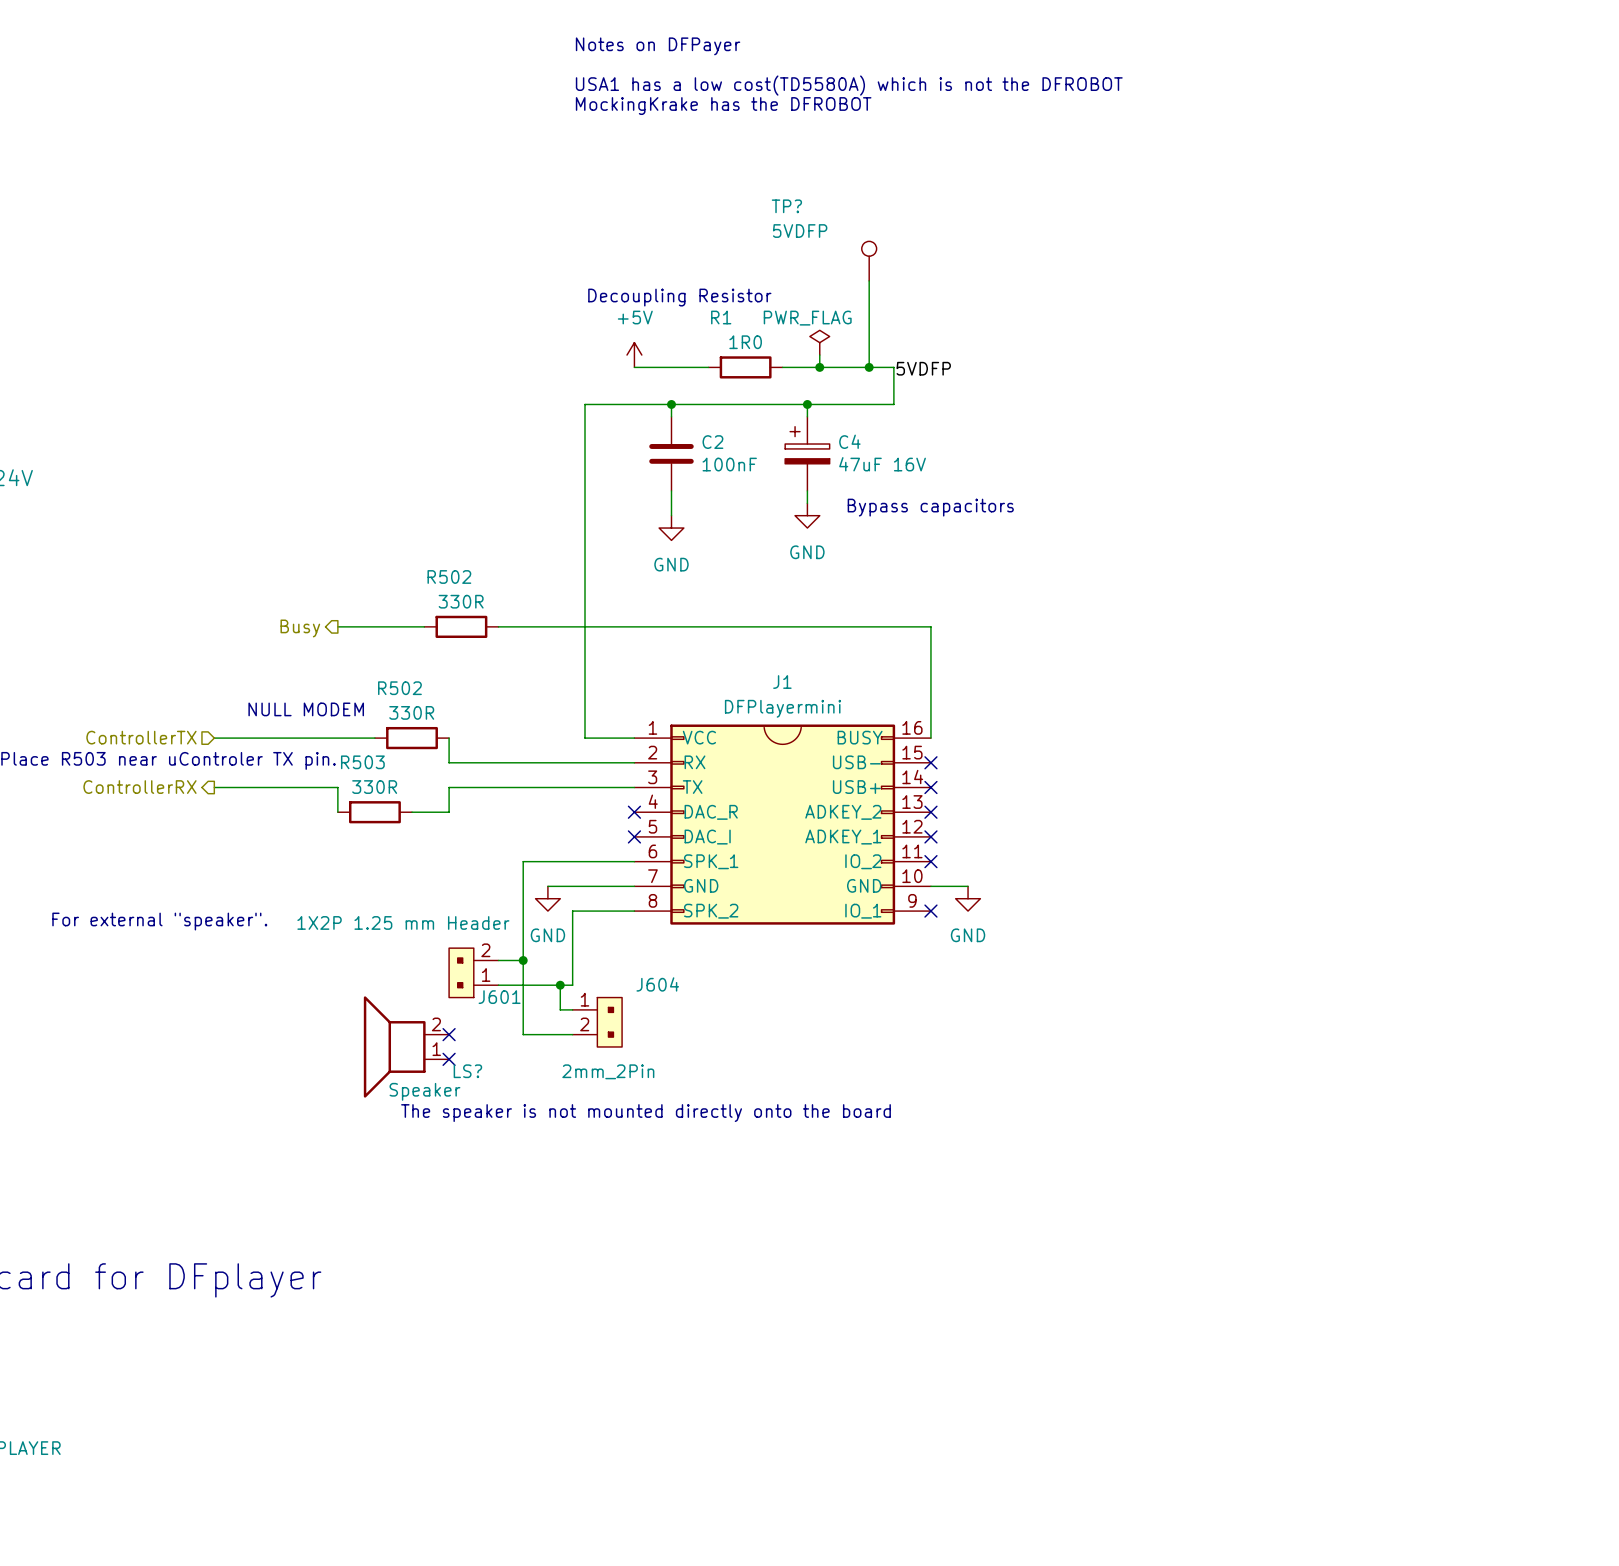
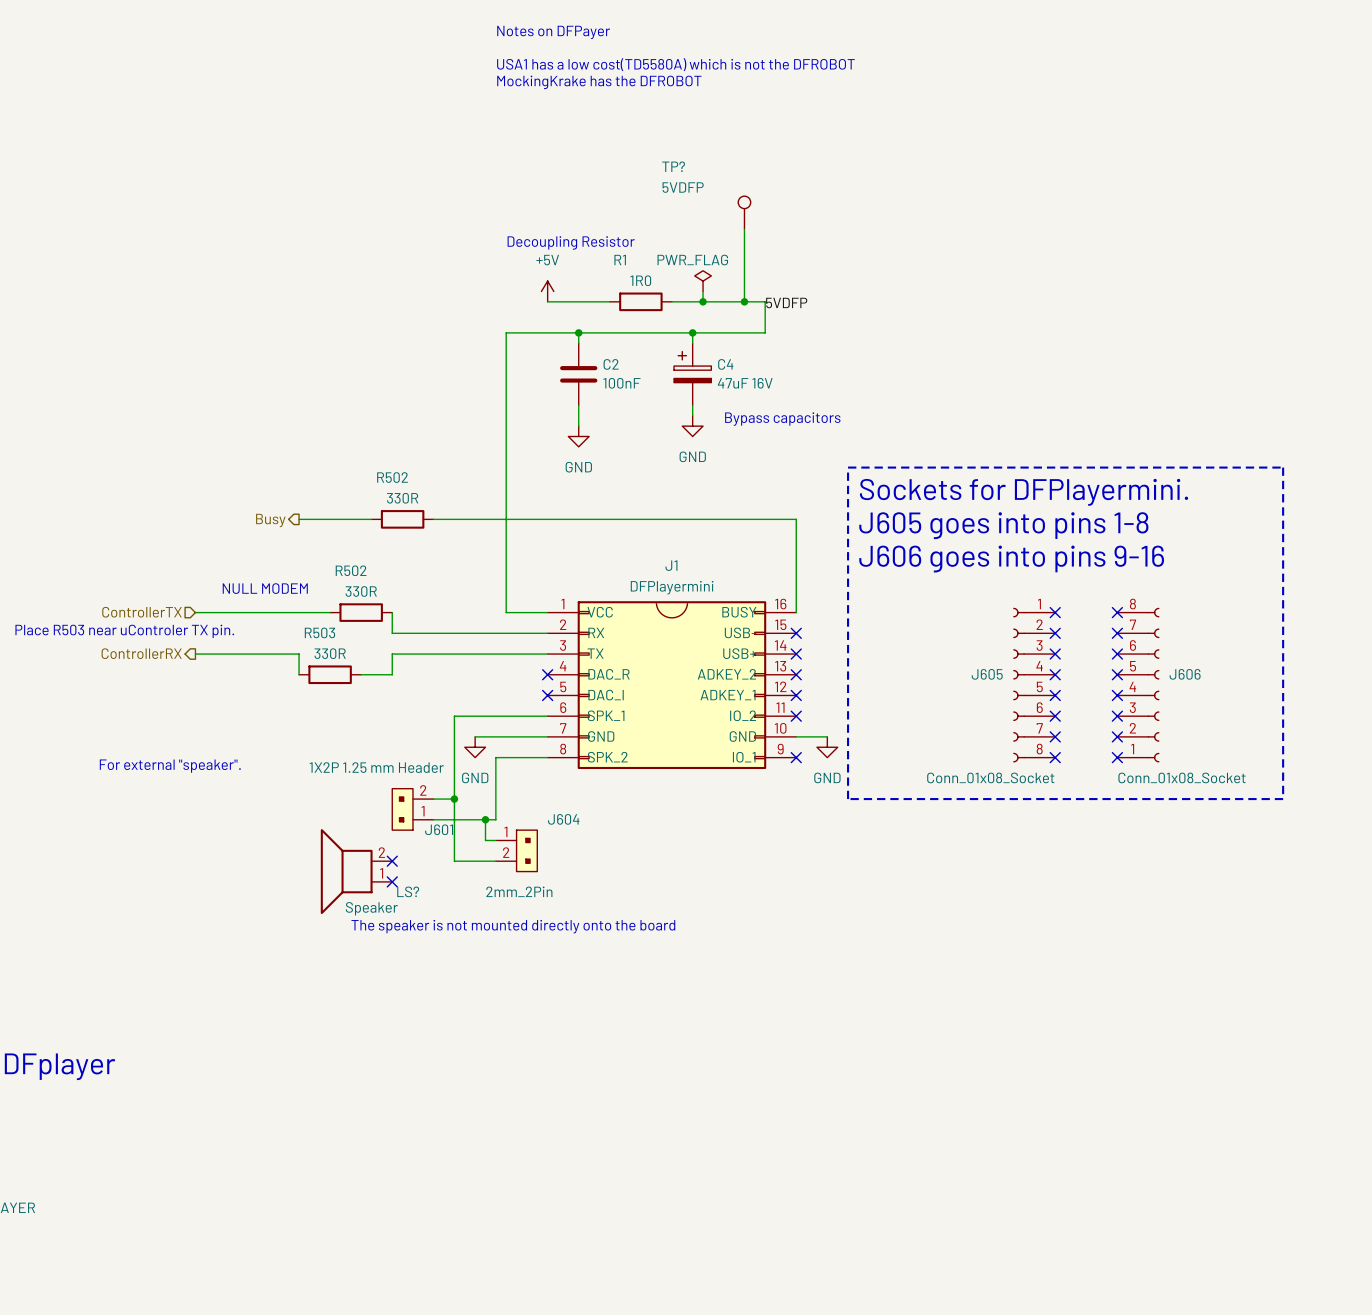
line: none -> (848, 467) (1283, 467) (1283, 799) (848, 799) (848, 467)
text: none -> Sockets for DFPlayermini. (1024, 492)
text: none -> J605 goes into pins 1-8 (1003, 525)
text: none -> J606 goes into pins 9-16 (1011, 559)
no-connect mark: none -> (1055, 612)
no-connect mark: none -> (1117, 612)
no-connect mark: none -> (1055, 633)
no-connect mark: none -> (1117, 633)
no-connect mark: none -> (1055, 654)
no-connect mark: none -> (1117, 654)
no-connect mark: none -> (1055, 674)
no-connect mark: none -> (1117, 674)
J605: none -> Conn_01x08_Socket (1034, 685)
J606: none -> Conn_01x08_Socket (1138, 685)
no-connect mark: none -> (1055, 695)
no-connect mark: none -> (1117, 695)
no-connect mark: none -> (1055, 716)
no-connect mark: none -> (1117, 716)
no-connect mark: none -> (1055, 736)
no-connect mark: none -> (1117, 736)
no-connect mark: none -> (1055, 757)
no-connect mark: none -> (1117, 757)

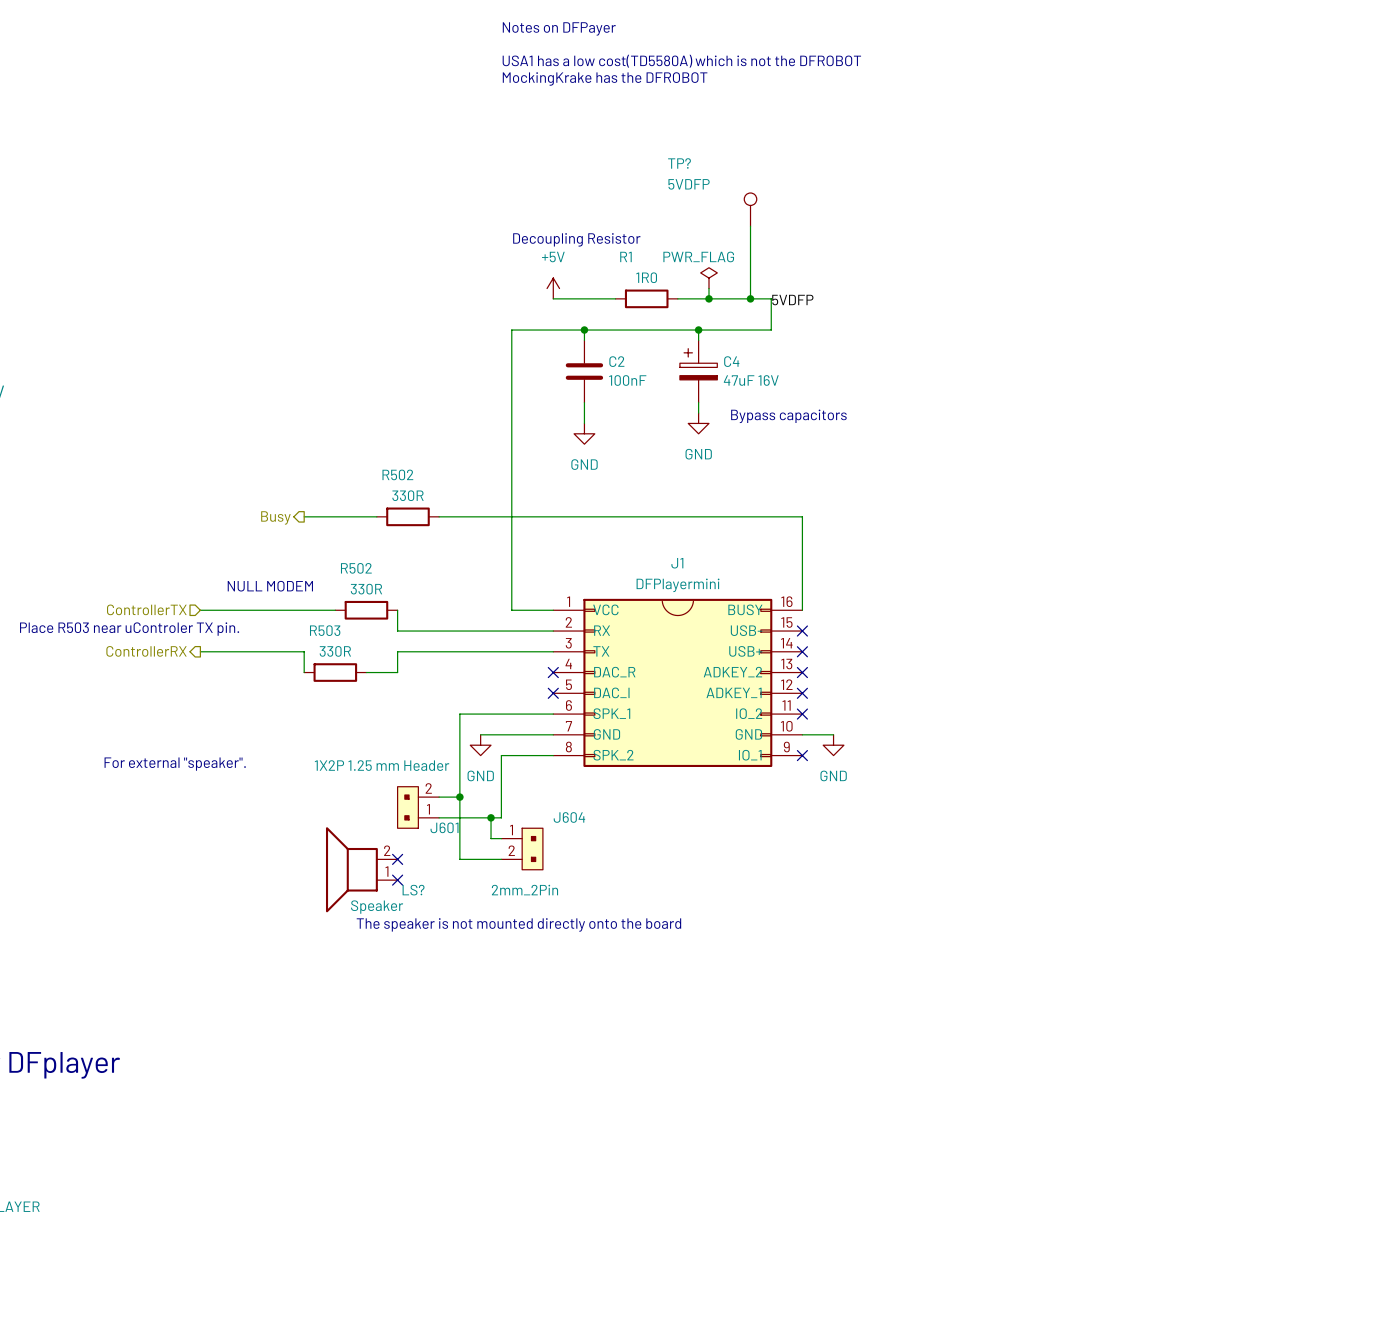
line: (848, 467) (1283, 467) (1283, 799) (848, 799) (848, 467) -> none
text: Sockets for DFPlayermini. (1024, 492) -> none
text: J605 goes into pins 1-8 (1003, 525) -> none
text: J606 goes into pins 9-16 (1011, 559) -> none
no-connect mark: (1055, 612) -> none
no-connect mark: (1117, 612) -> none
no-connect mark: (1055, 633) -> none
no-connect mark: (1117, 633) -> none
no-connect mark: (1055, 654) -> none
no-connect mark: (1117, 654) -> none
no-connect mark: (1055, 674) -> none
no-connect mark: (1117, 674) -> none
J605: Conn_01x08_Socket (1034, 685) -> none
J606: Conn_01x08_Socket (1138, 685) -> none
no-connect mark: (1055, 695) -> none
no-connect mark: (1117, 695) -> none
no-connect mark: (1055, 716) -> none
no-connect mark: (1117, 716) -> none
no-connect mark: (1055, 736) -> none
no-connect mark: (1117, 736) -> none
no-connect mark: (1055, 757) -> none
no-connect mark: (1117, 757) -> none

